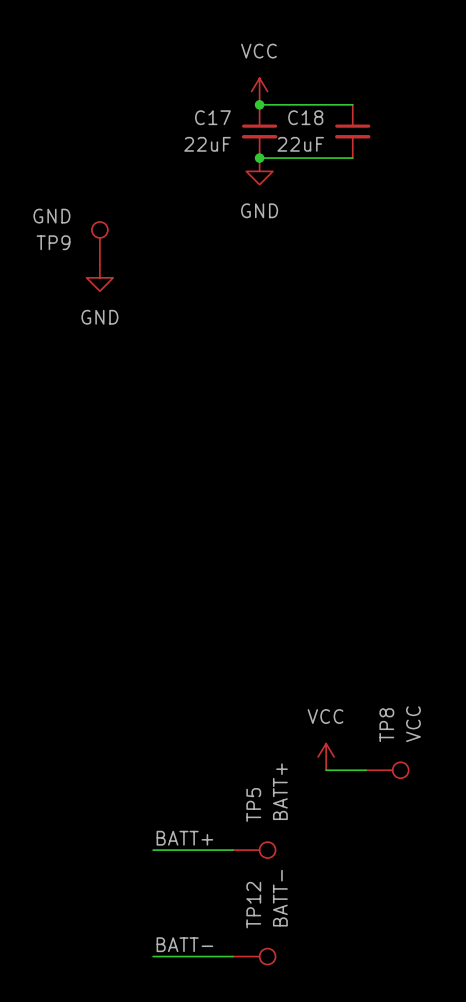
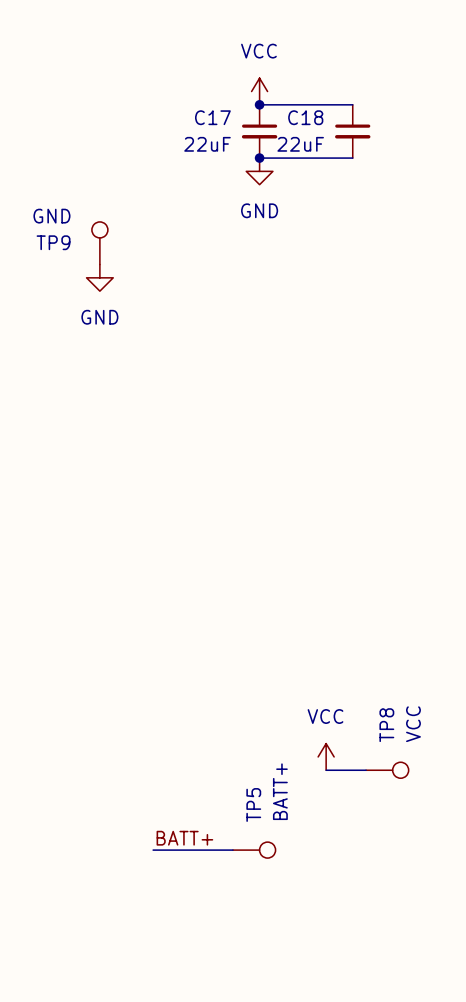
label: BATT- (184, 944) -> none
wire: (153, 956) (232, 956) -> none
TP12: BATT- (254, 956) -> none

